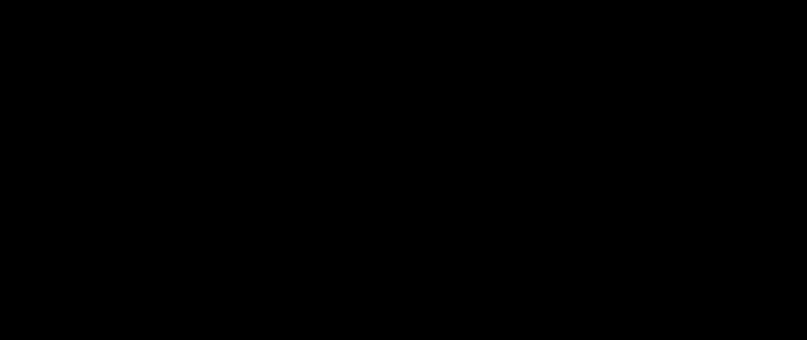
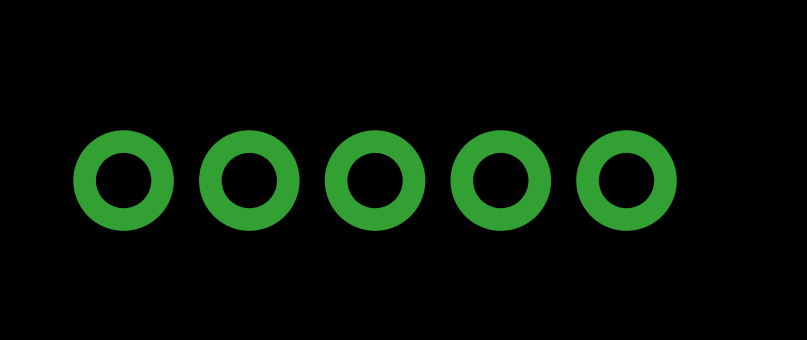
part: none -> (375, 180)

